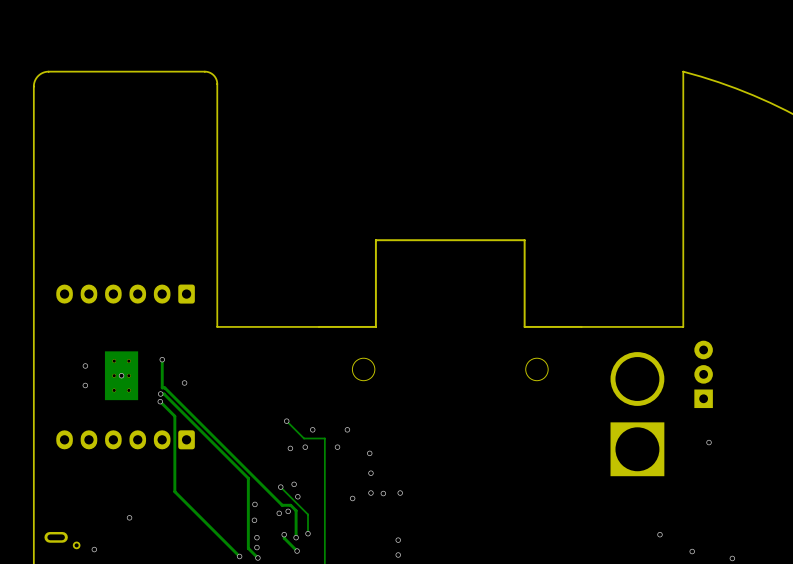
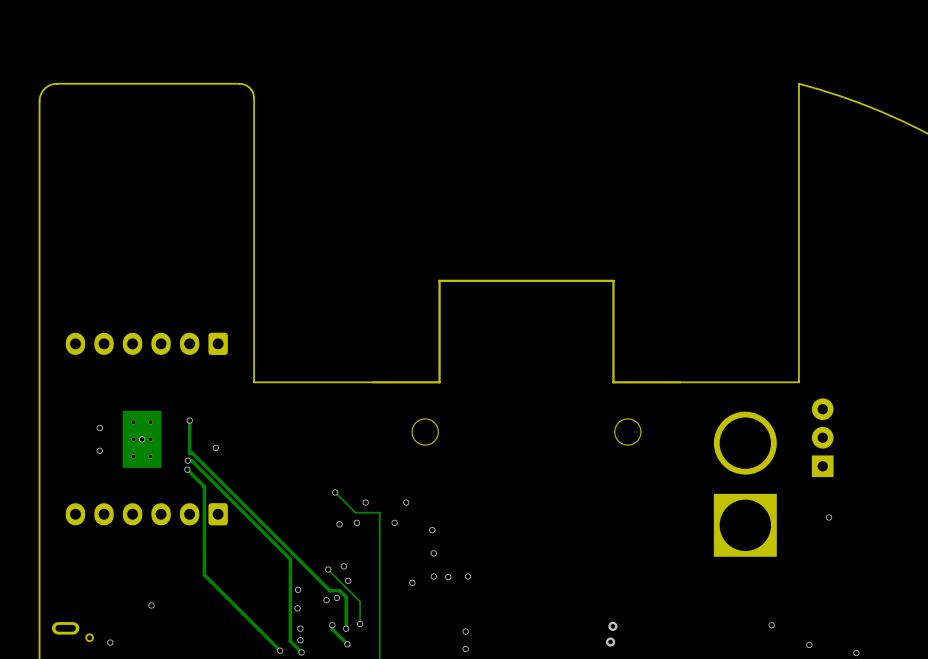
via: none -> (612, 626)
via: none -> (610, 642)

